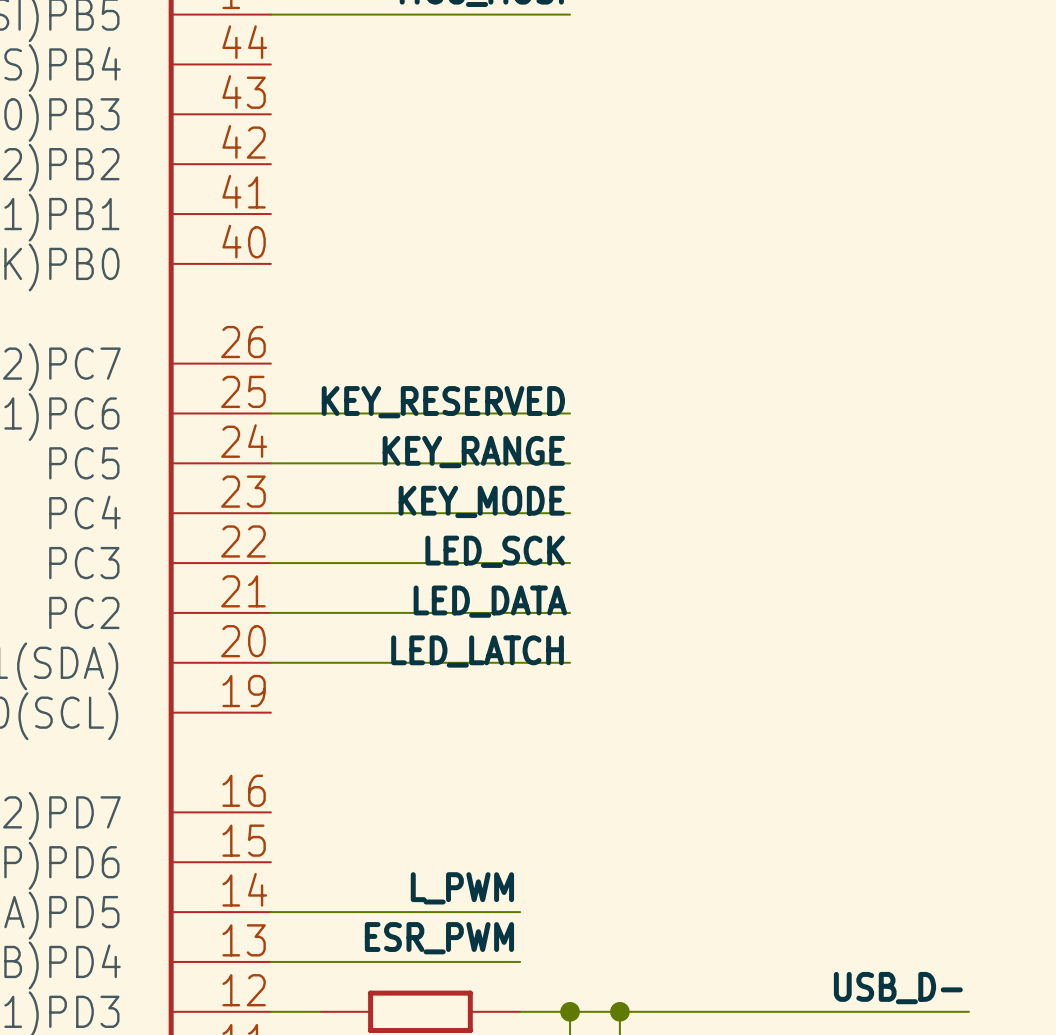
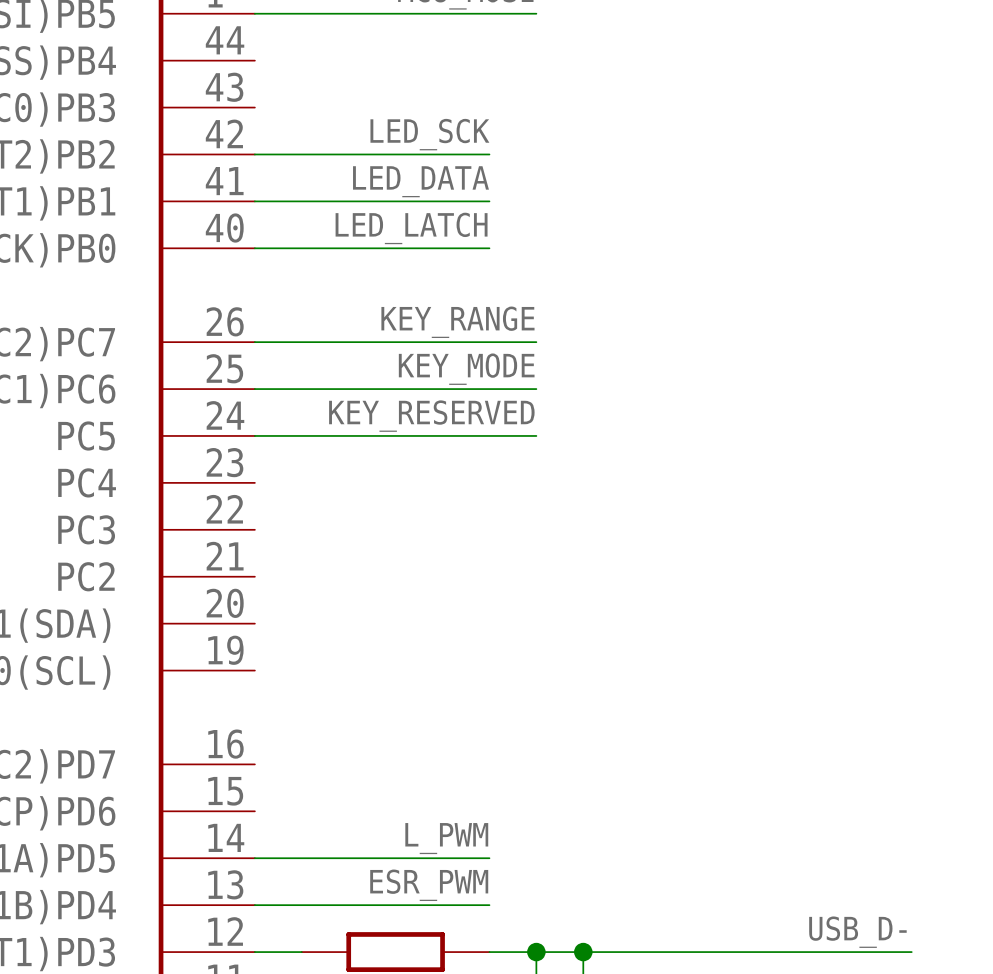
wire: none -> (254, 154) (489, 154)
wire: none -> (254, 201) (489, 201)
wire: none -> (254, 248) (489, 248)
label position: KEY_RESERVED (443, 402) -> KEY_RESERVED (431, 416)
label position: KEY_RANGE (473, 452) -> KEY_RANGE (457, 322)
label position: KEY_MODE (481, 501) -> KEY_MODE (466, 369)
wire: (270, 513) (570, 513) -> (254, 342) (536, 342)
label position: LED_SCK (495, 551) -> LED_SCK (429, 134)
wire: (270, 563) (570, 563) -> none
label position: LED_DATA (490, 601) -> LED_DATA (420, 181)
wire: (270, 612) (570, 612) -> none
label position: LED_LATCH (477, 651) -> LED_LATCH (411, 228)
wire: (270, 662) (570, 662) -> none

